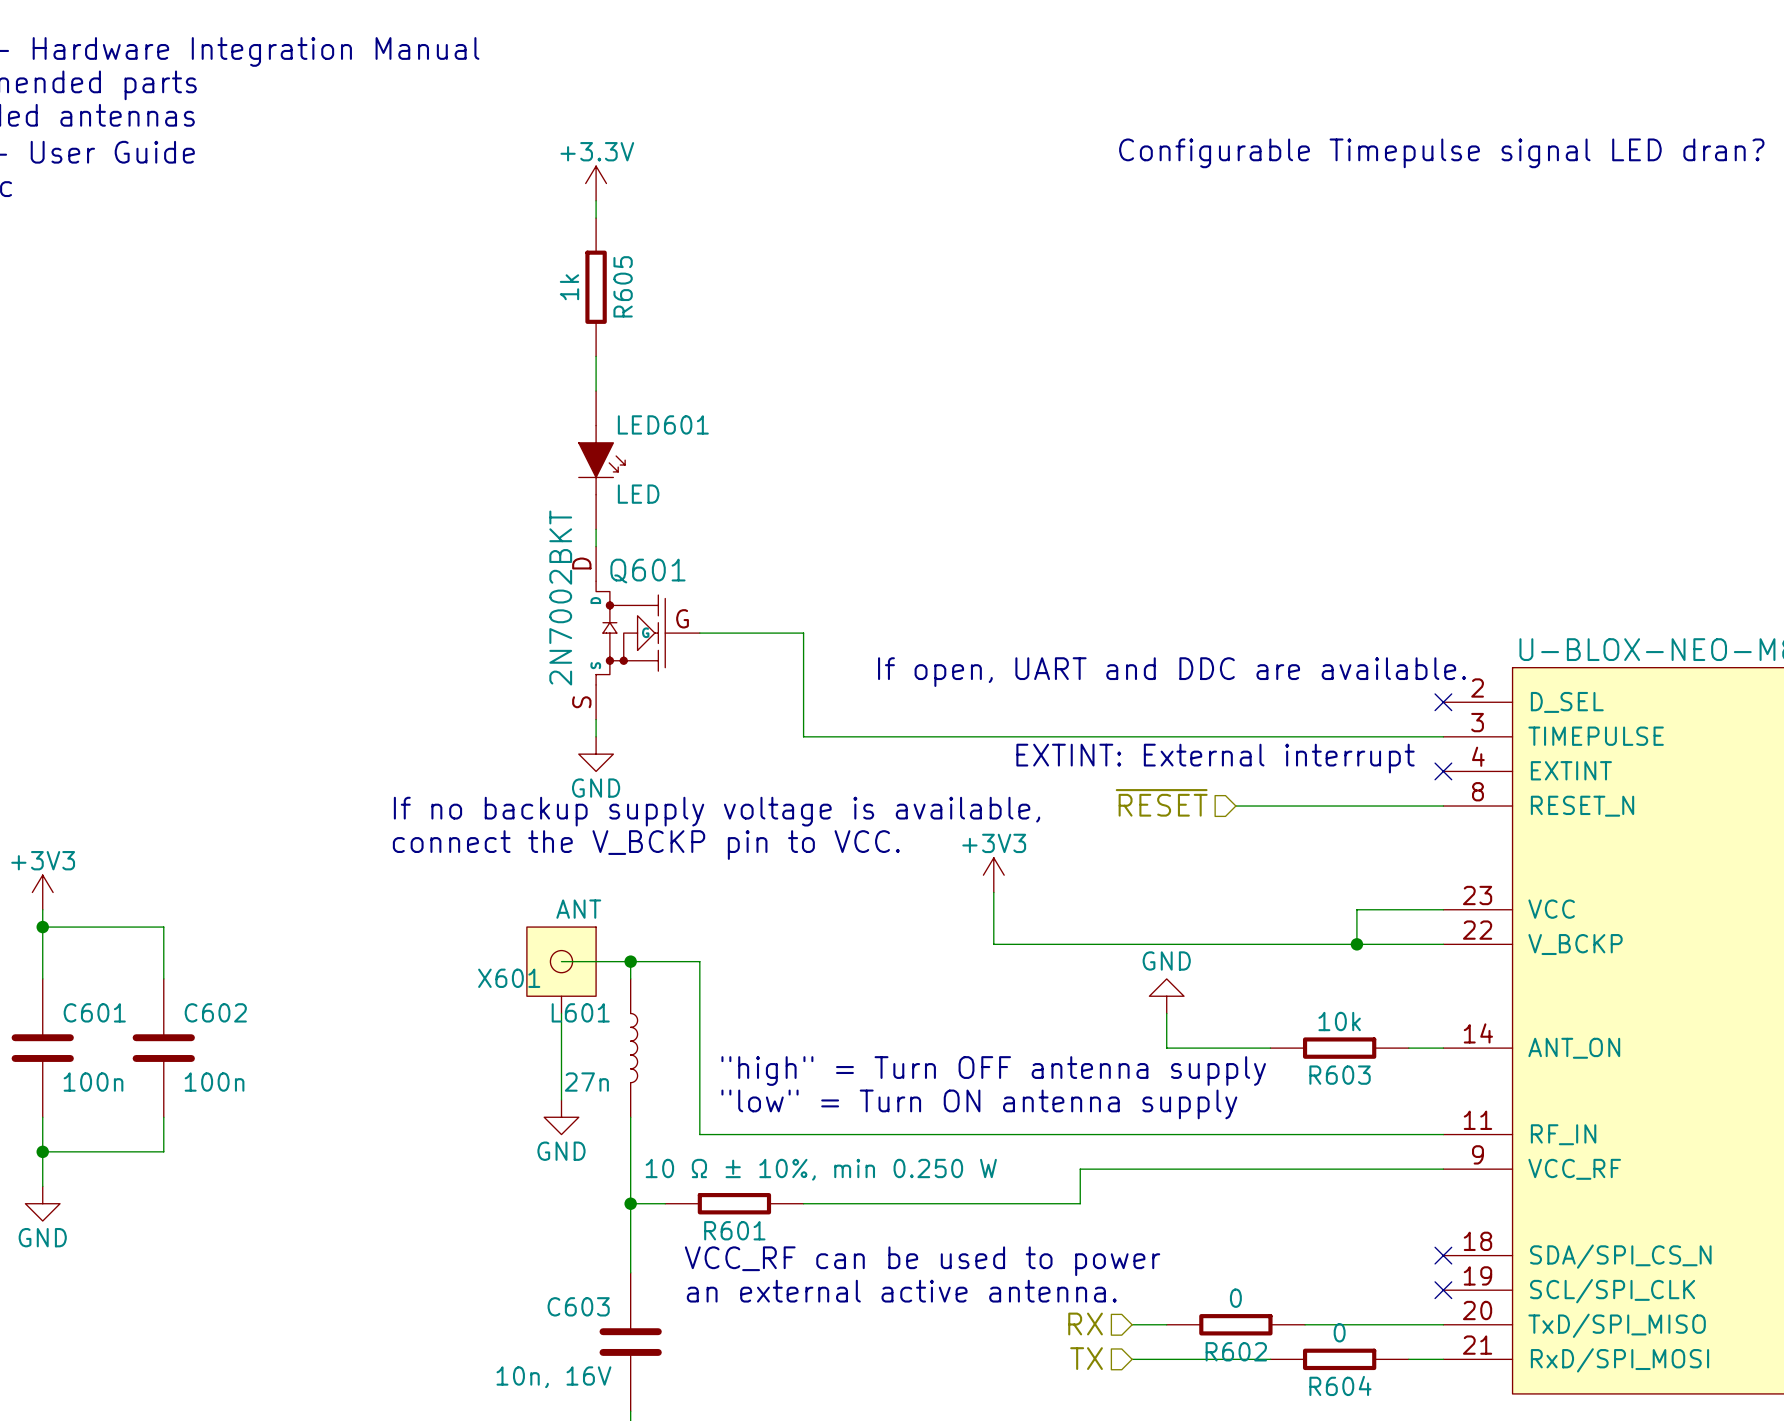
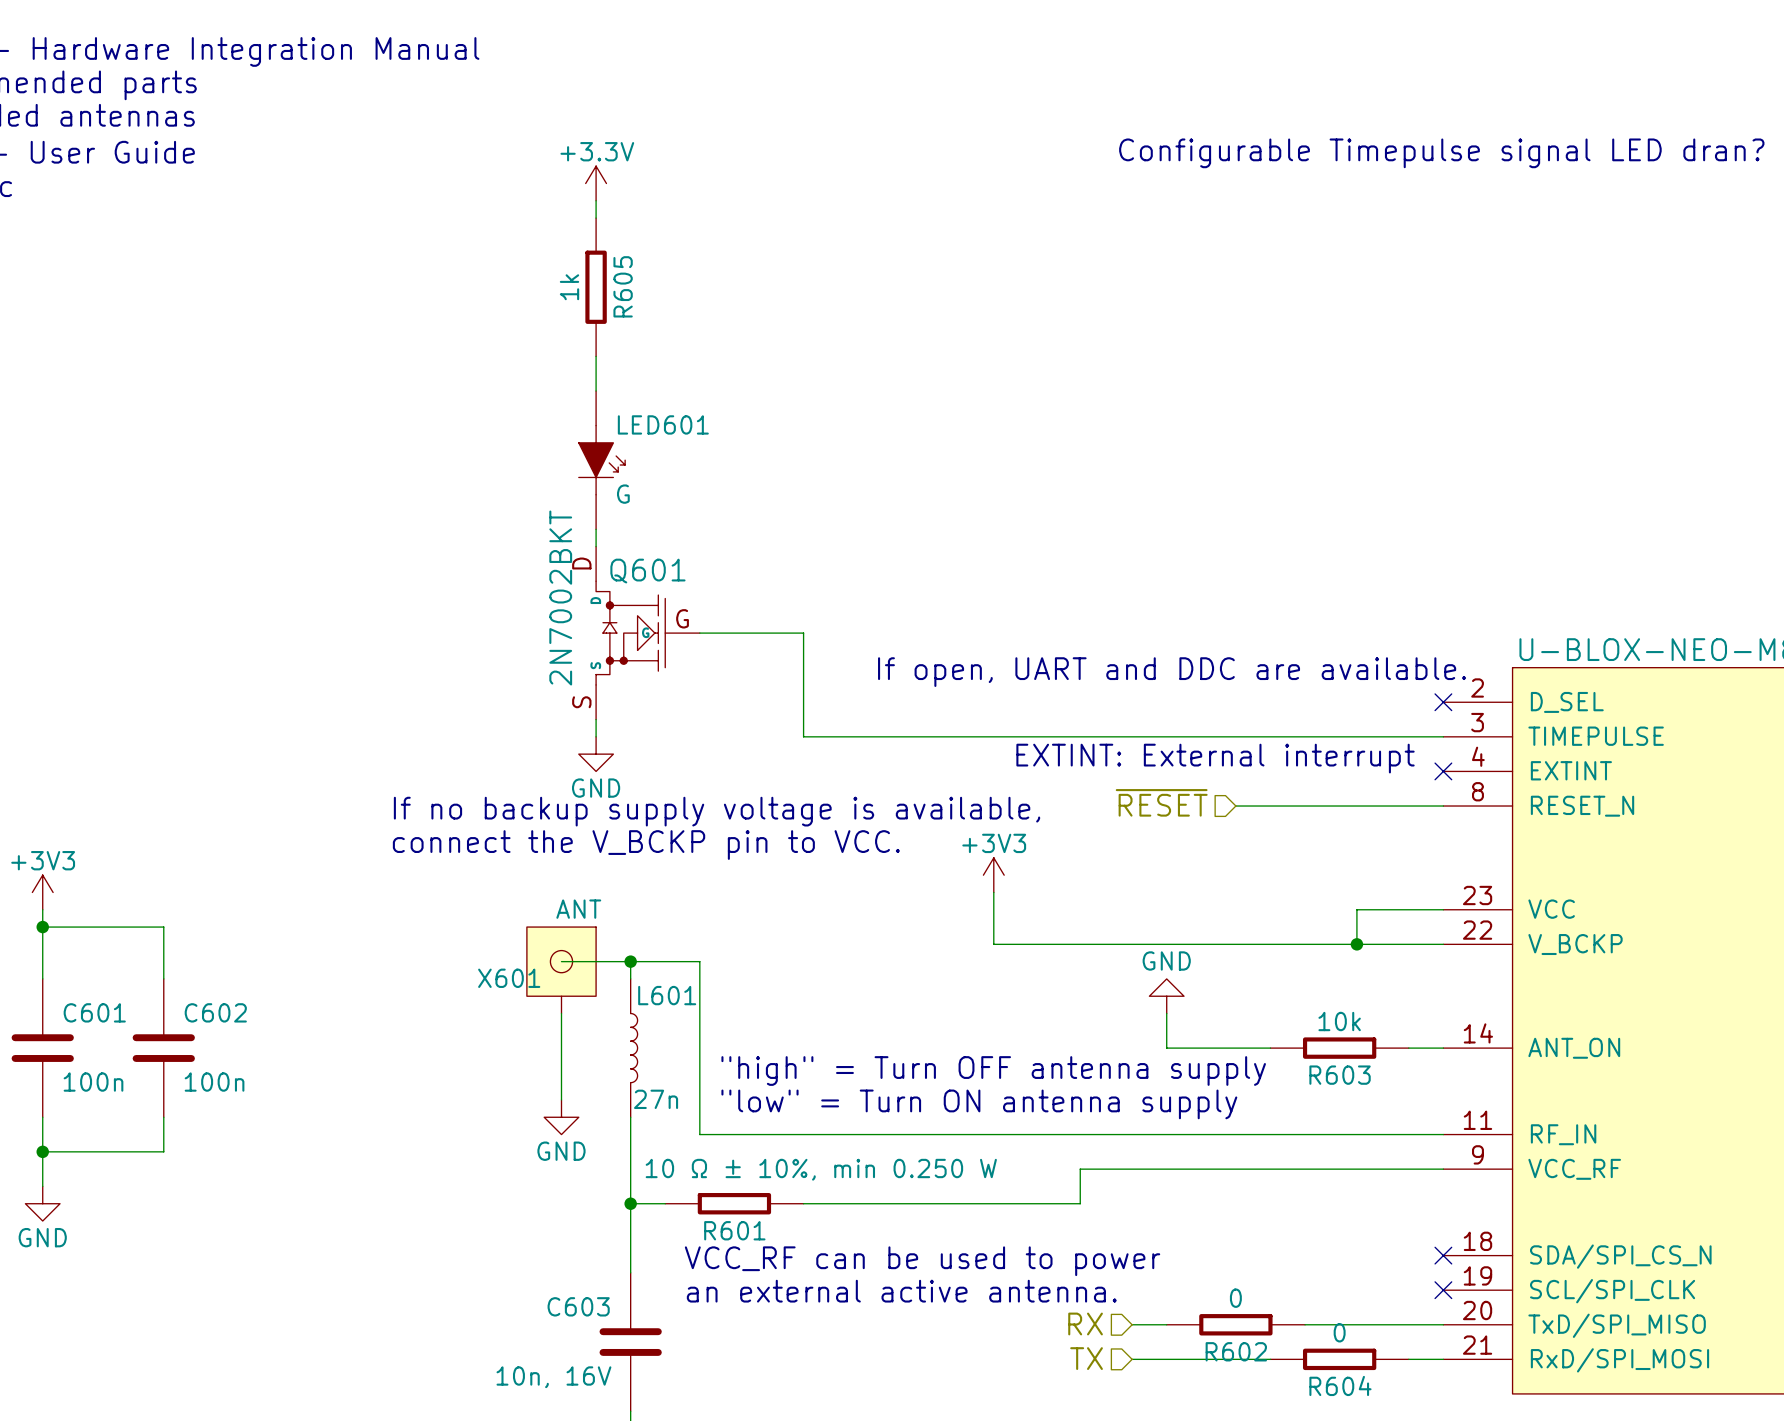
LED601 value: LED (638, 494) -> G (623, 494)
L601 name position: L601 (580, 1012) -> L601 (667, 995)
L601 value position: 27n (586, 1082) -> 27n (656, 1099)

